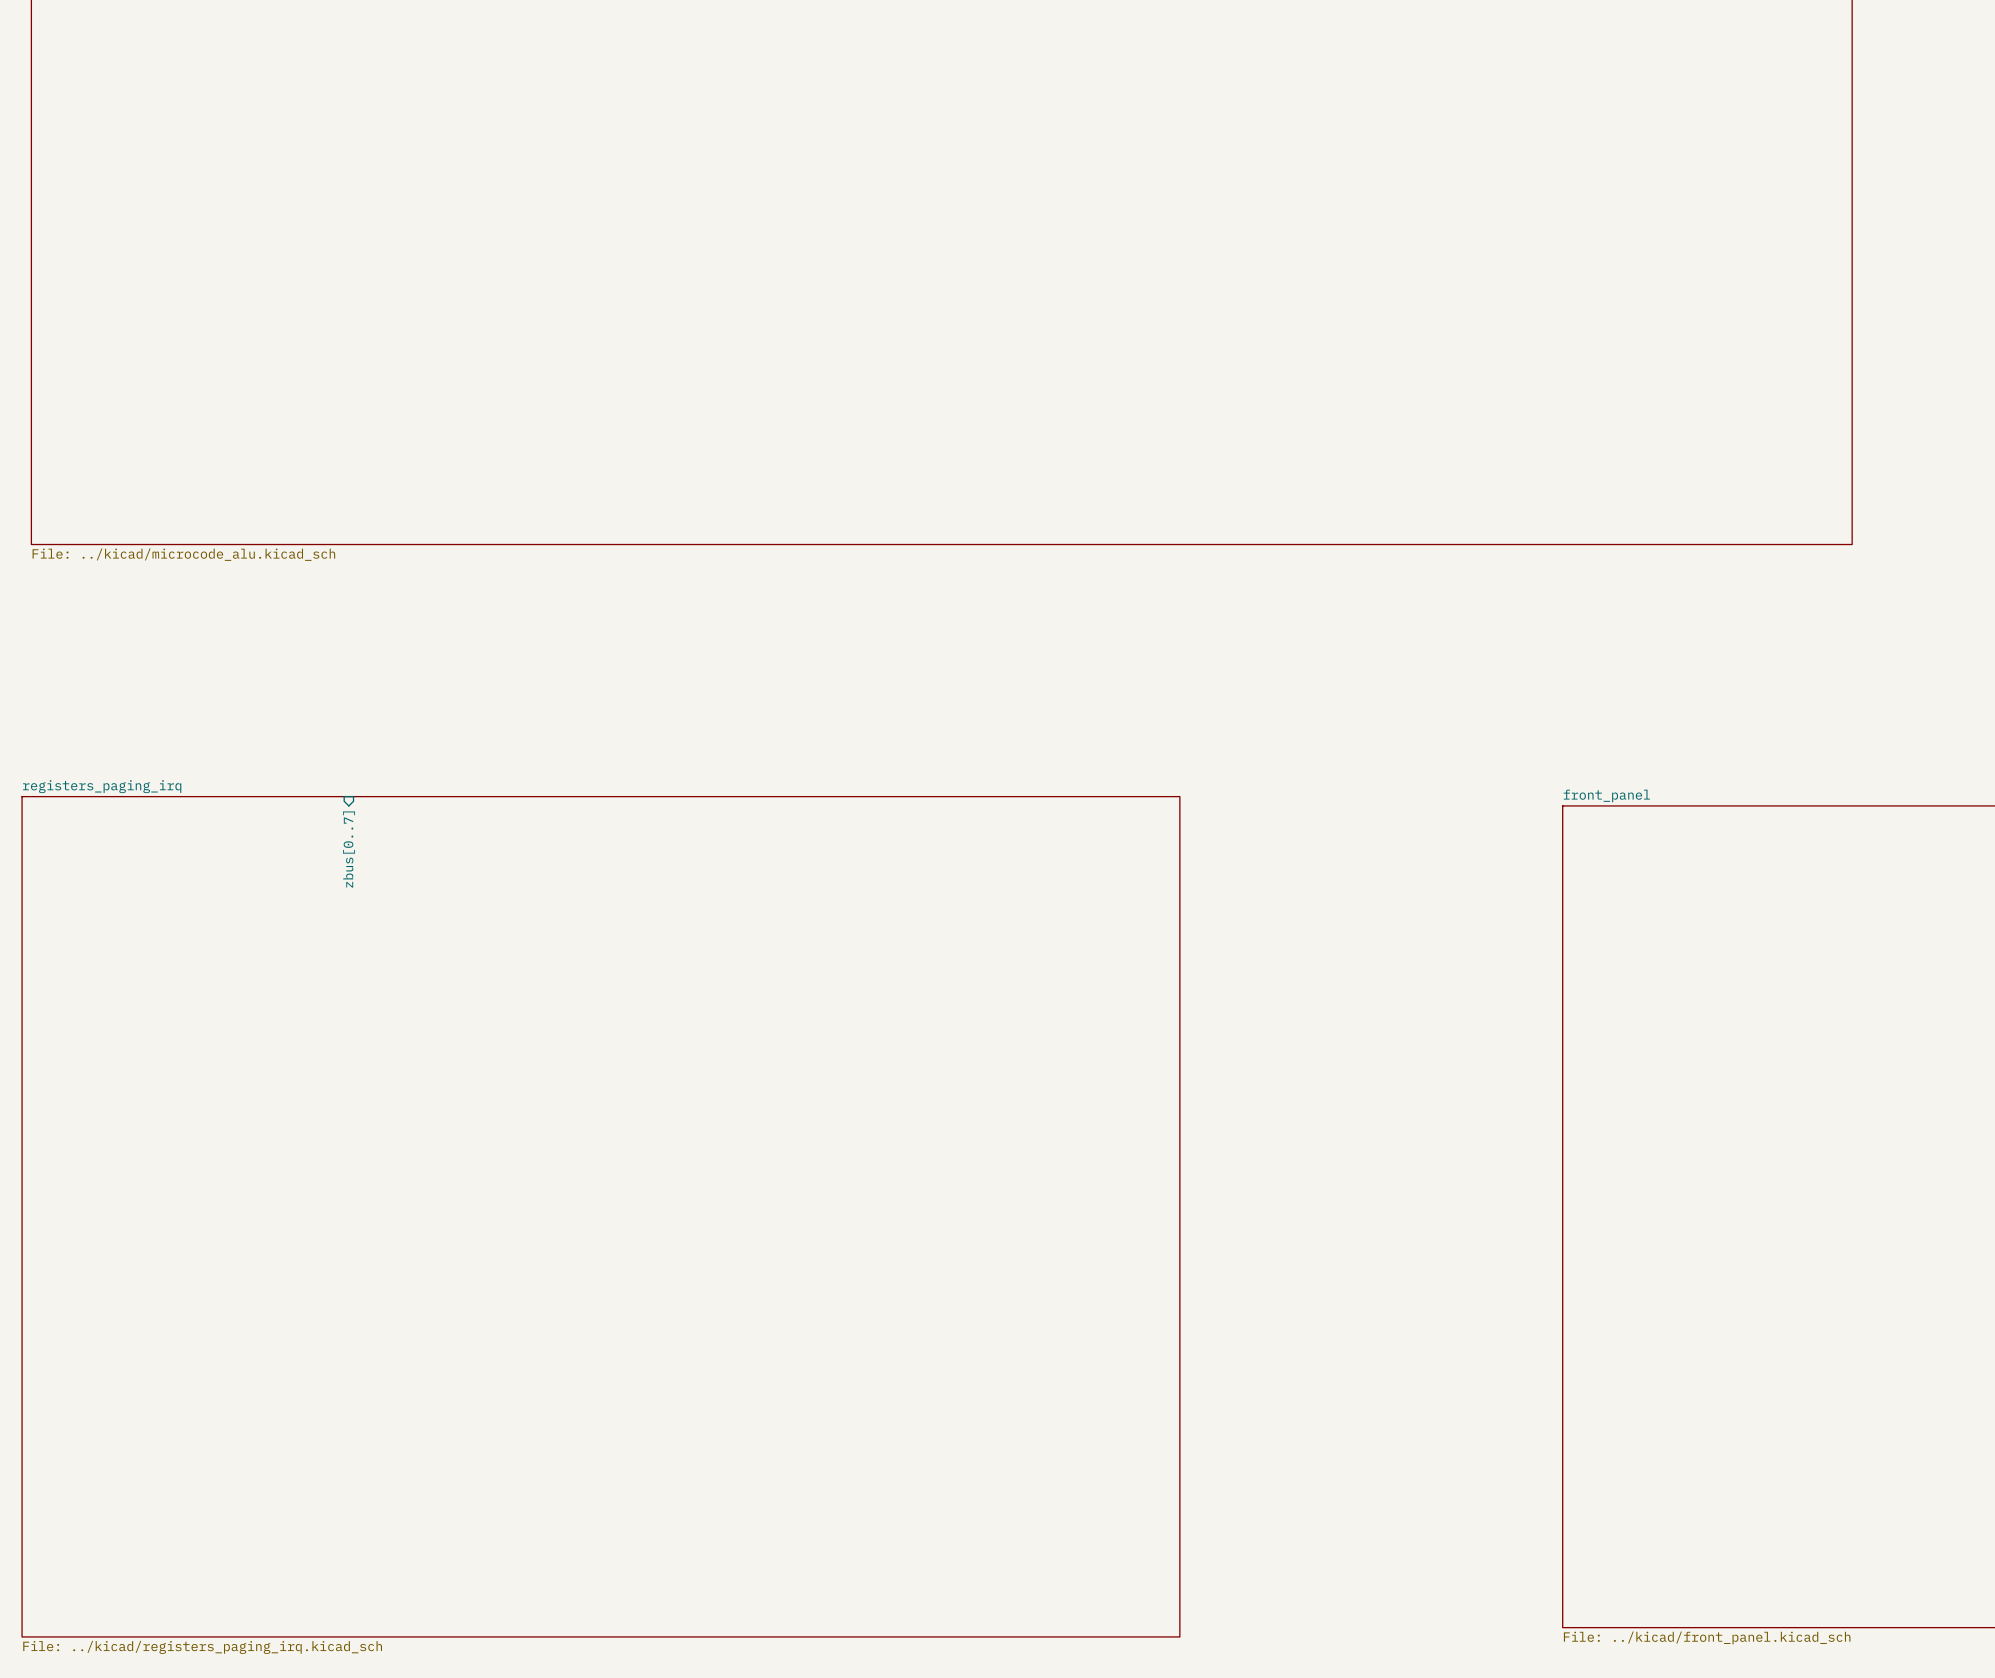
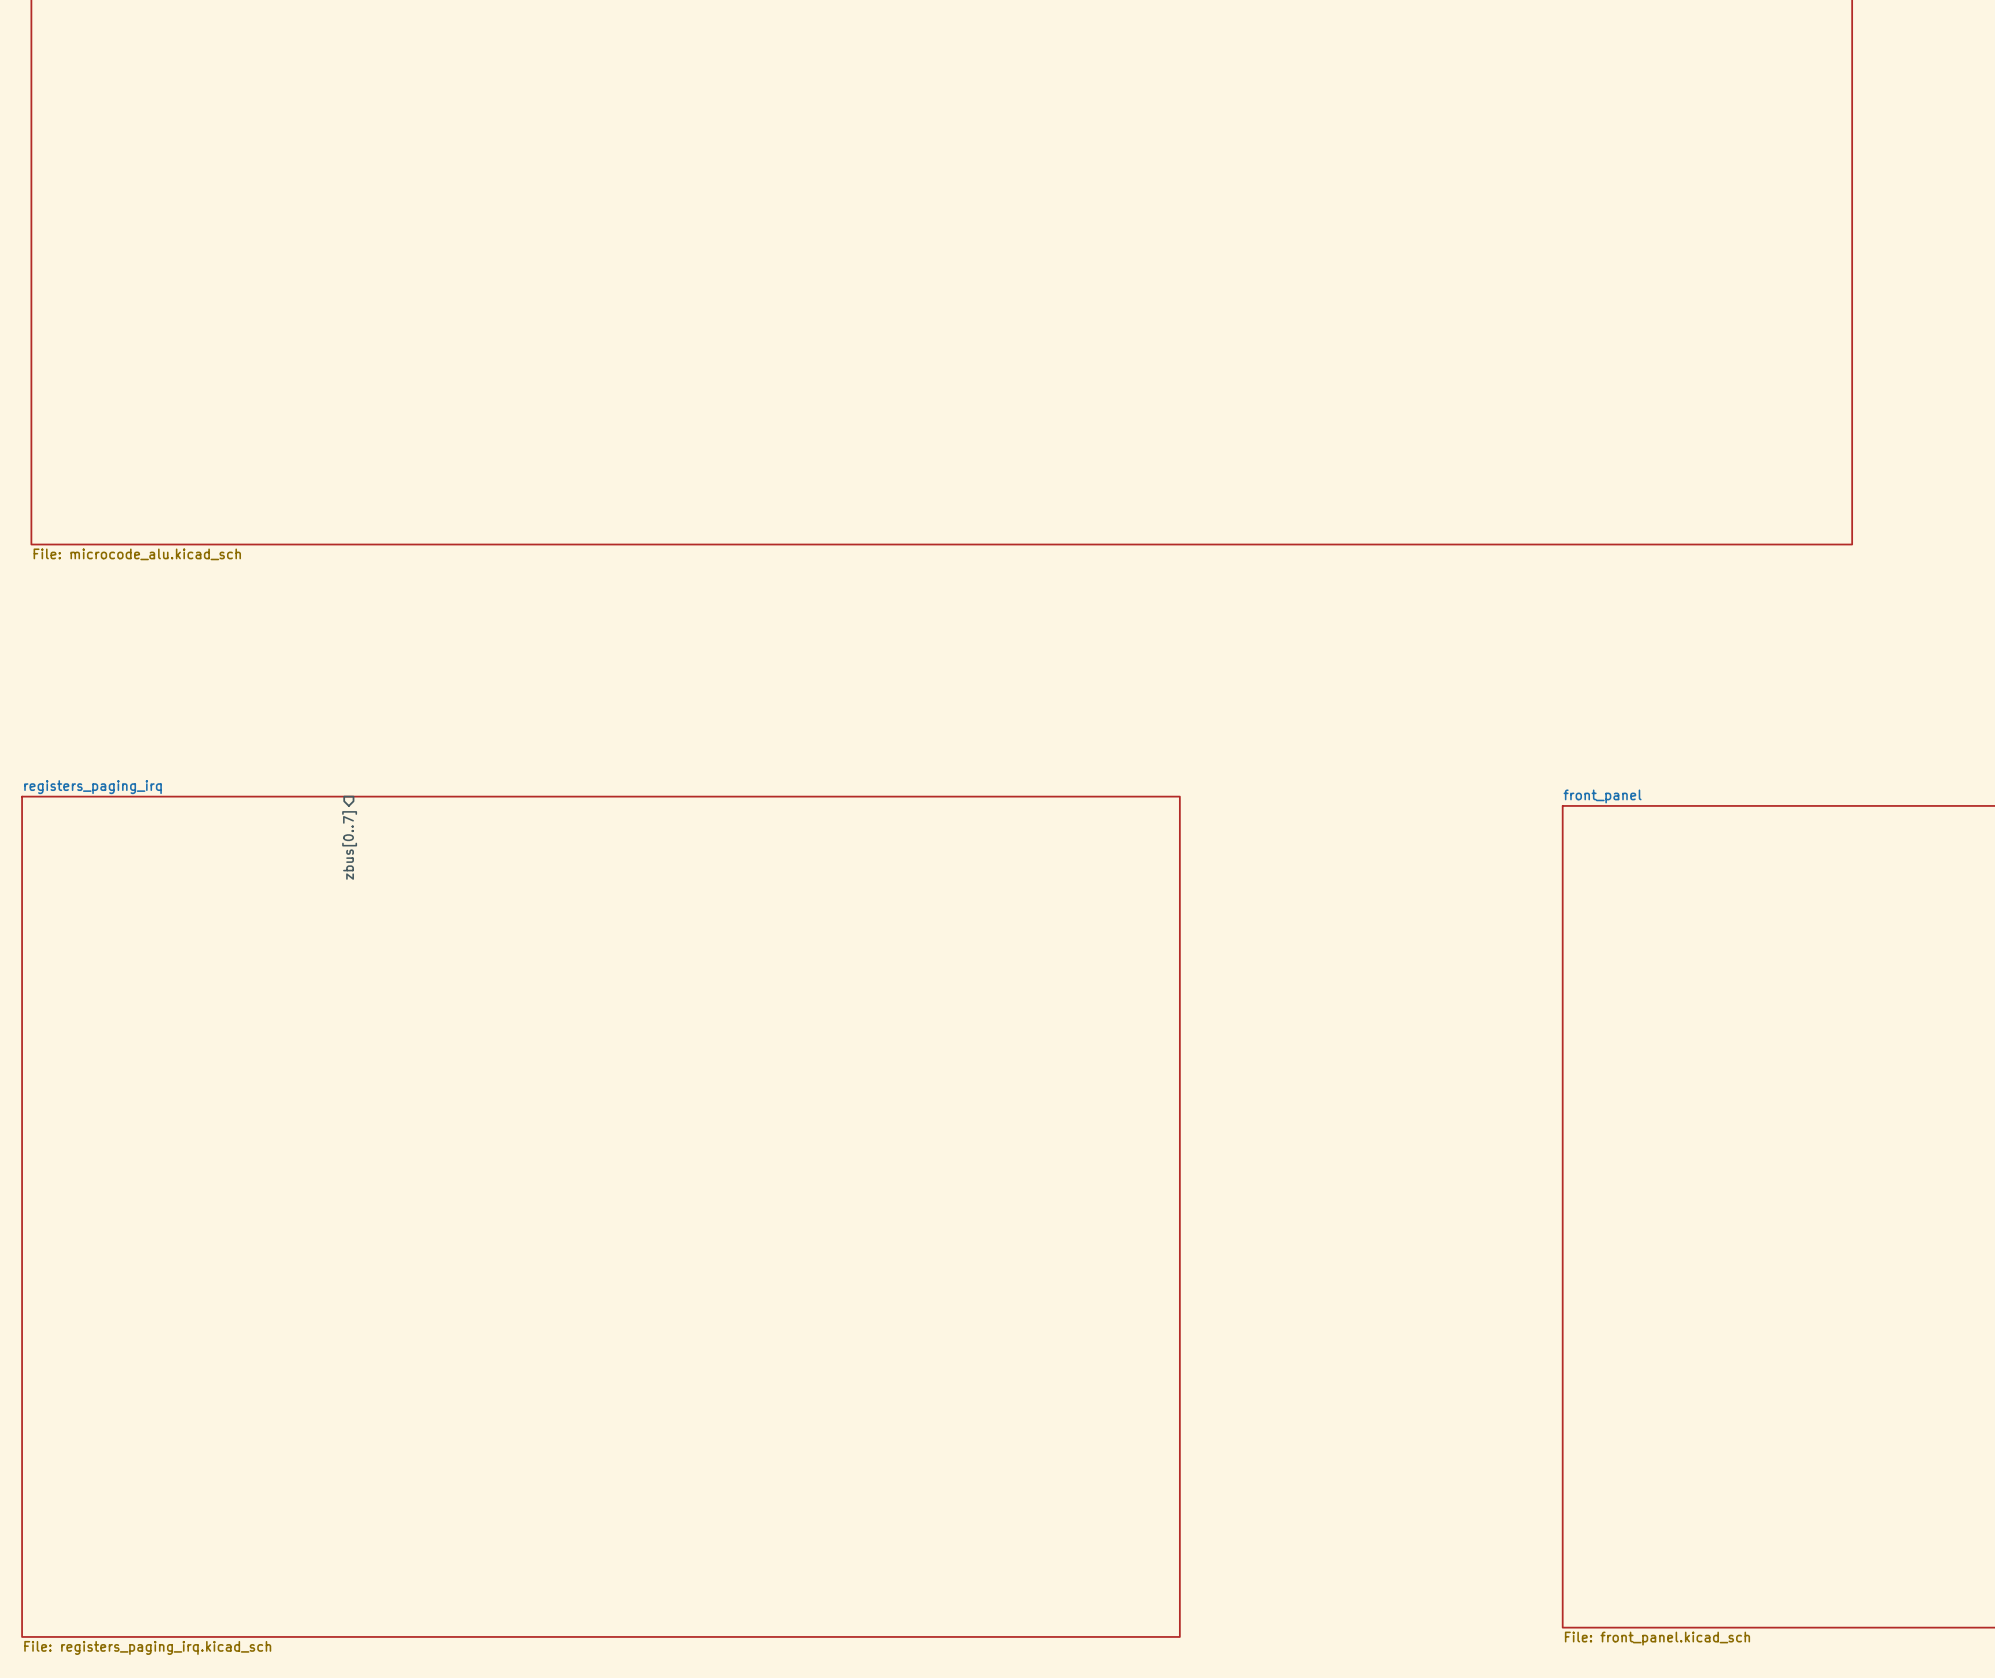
sheet value: File: ../kicad/microcode_alu.kicad_sch (183, 554) -> File: microcode_alu.kicad_sch (137, 554)
sheet front_panel value: File: ../kicad/front_panel.kicad_sch (1707, 1637) -> File: front_panel.kicad_sch (1657, 1638)
sheet registers_paging_irq value: File: ../kicad/registers_paging_irq.kicad_sch (202, 1647) -> File: registers_paging_irq.kicad_sch (147, 1647)

